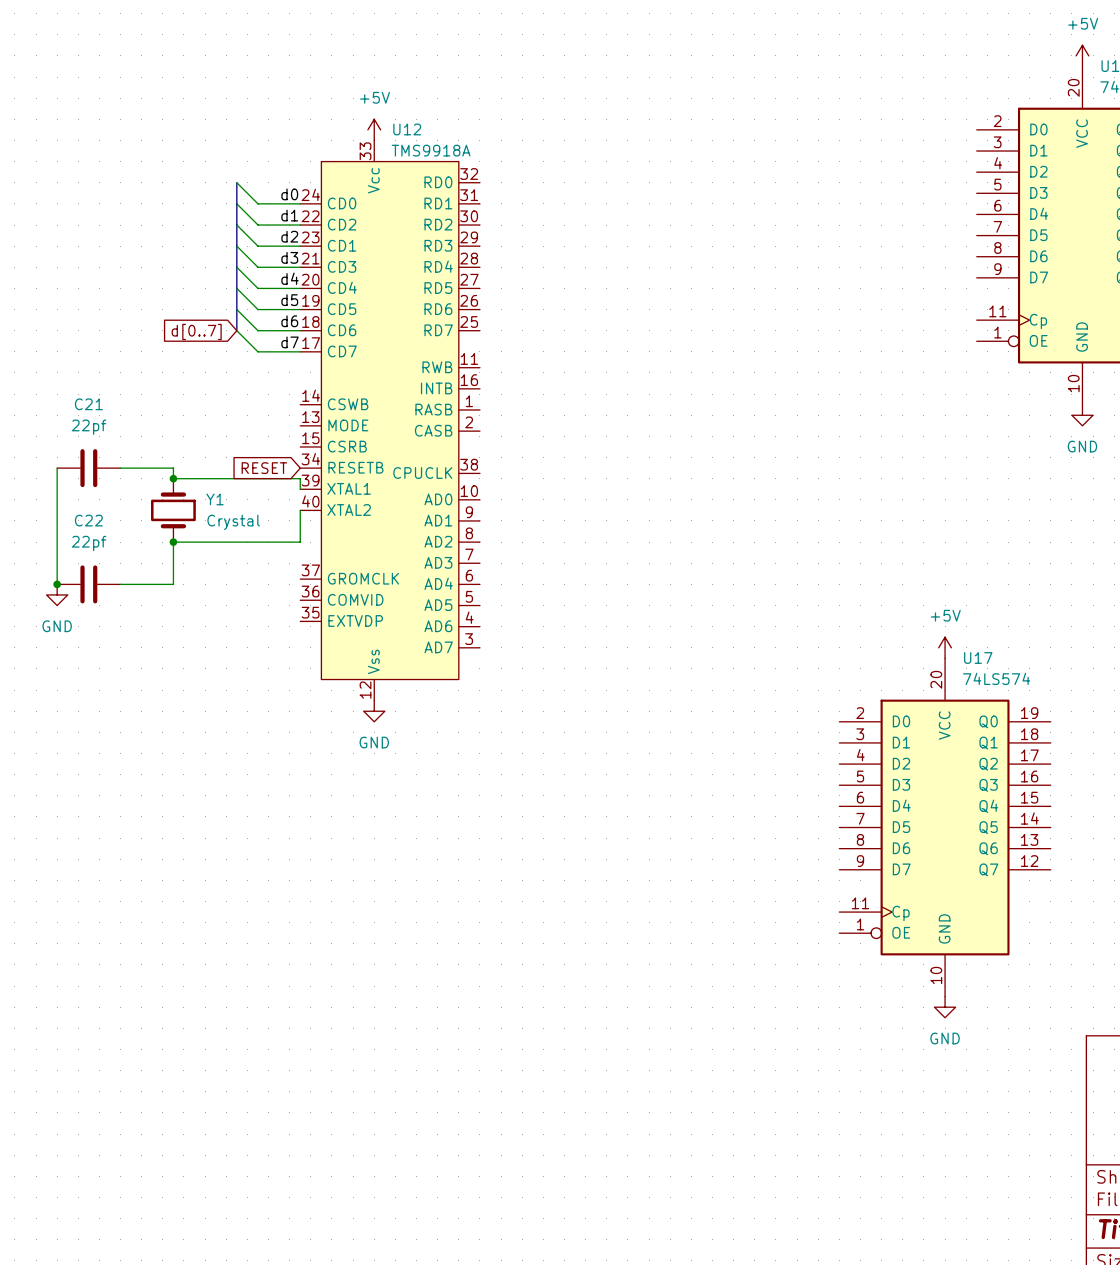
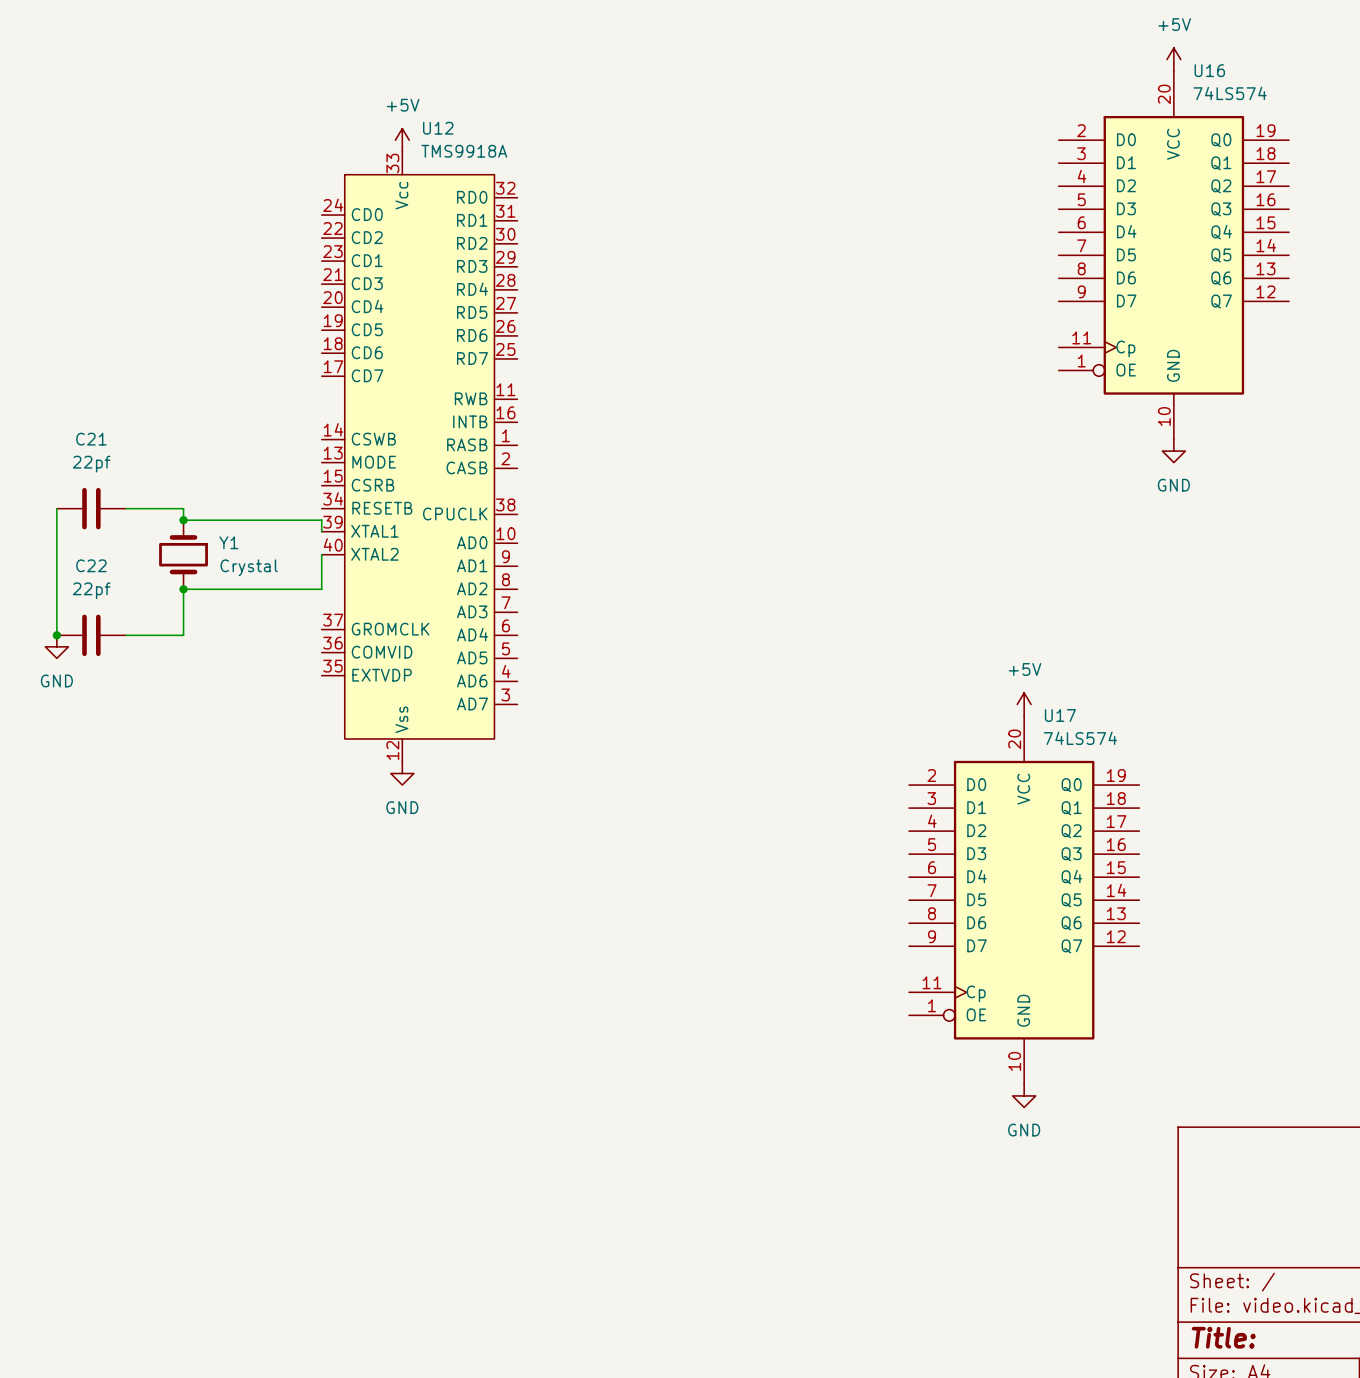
U12 symbol: [300, 140, 480, 701] -> [321, 151, 518, 763]
wire: (236, 182) (257, 203) (300, 203) -> none
bus: (236, 182) (236, 330) -> none
label: d0 (289, 194) -> none
wire: (236, 203) (257, 225) (300, 225) -> none
label: d1 (289, 215) -> none
wire: (236, 225) (257, 246) (300, 246) -> none
label: d2 (289, 236) -> none
wire: (236, 246) (257, 267) (300, 267) -> none
label: d3 (289, 257) -> none
wire: (236, 267) (257, 288) (300, 288) -> none
label: d4 (290, 278) -> none
wire: (236, 288) (257, 309) (300, 309) -> none
label: d5 (289, 300) -> none
wire: (236, 309) (257, 330) (300, 330) -> none
label: d6 (289, 321) -> none
wire: (236, 330) (257, 351) (300, 351) -> none
global label: d[0..7] (196, 331) -> none
label: d7 (290, 342) -> none
global label: RESET (264, 468) -> none

